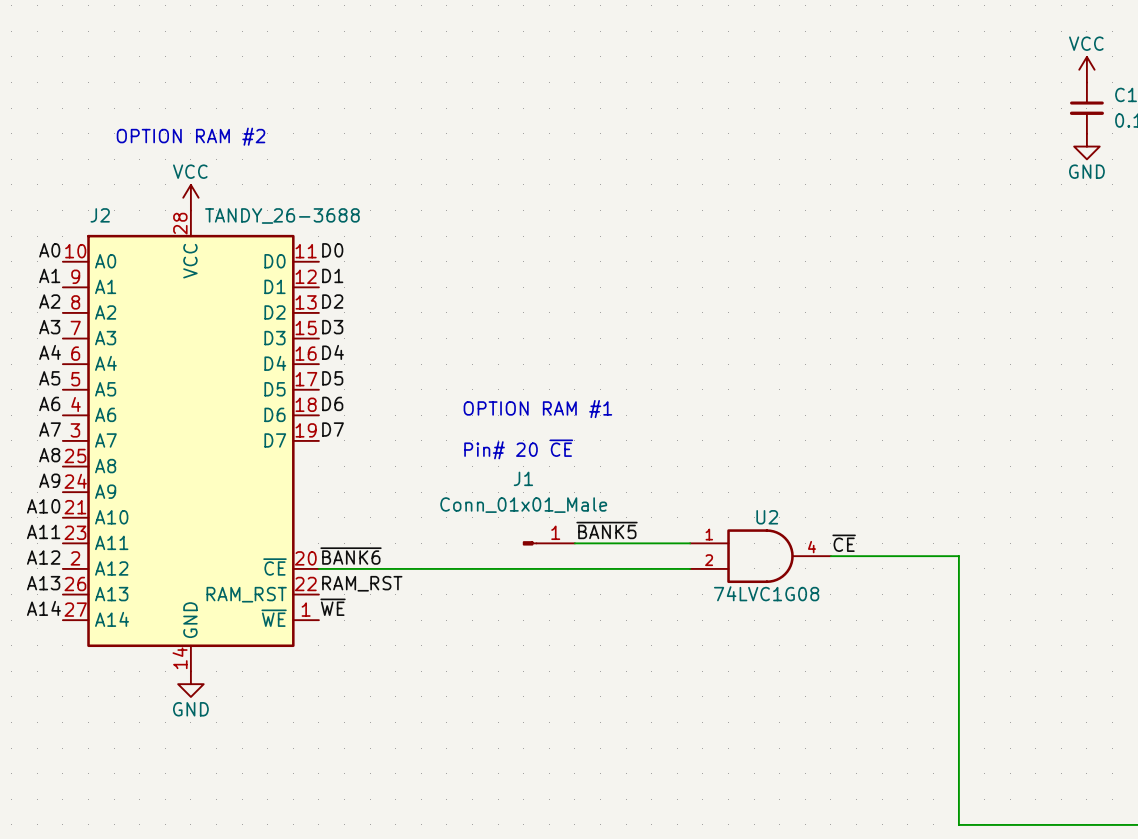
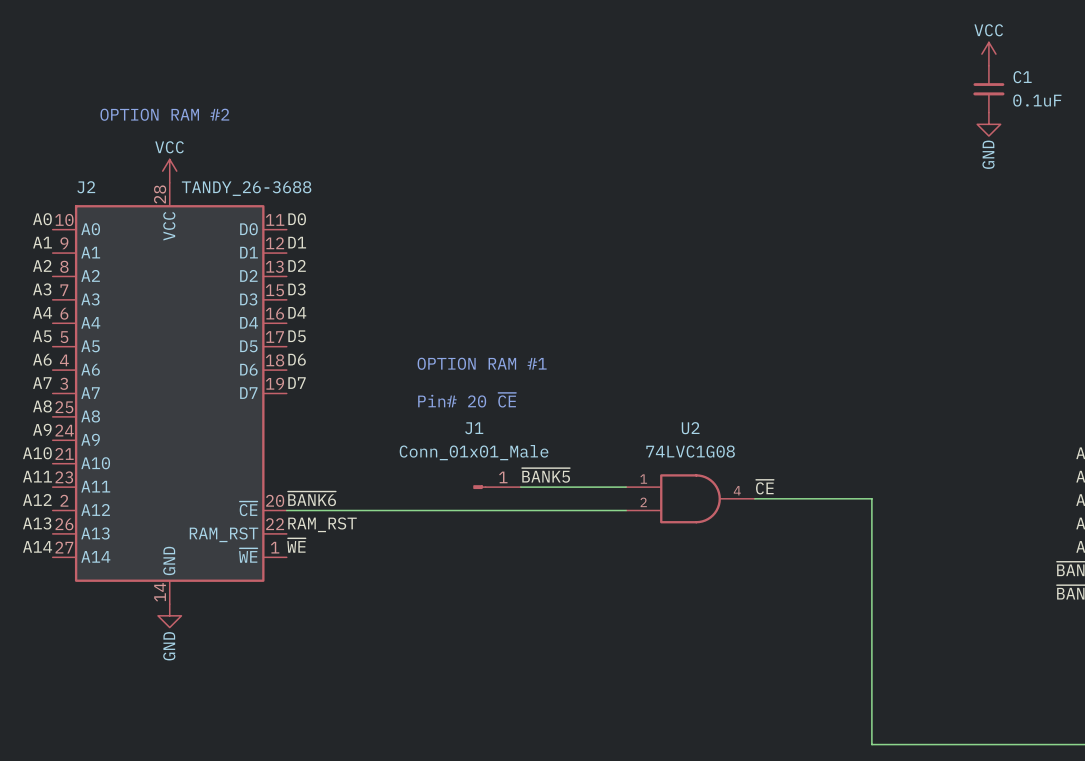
power symbol text rotation: 0° (1086, 171) -> 90° counterclockwise (988, 154)
U2 name position: U2 (767, 517) -> U2 (690, 428)
U2 value position: 74LVC1G08 (766, 593) -> 74LVC1G08 (690, 451)
power symbol text rotation: 0° (190, 709) -> 90° counterclockwise (169, 646)

